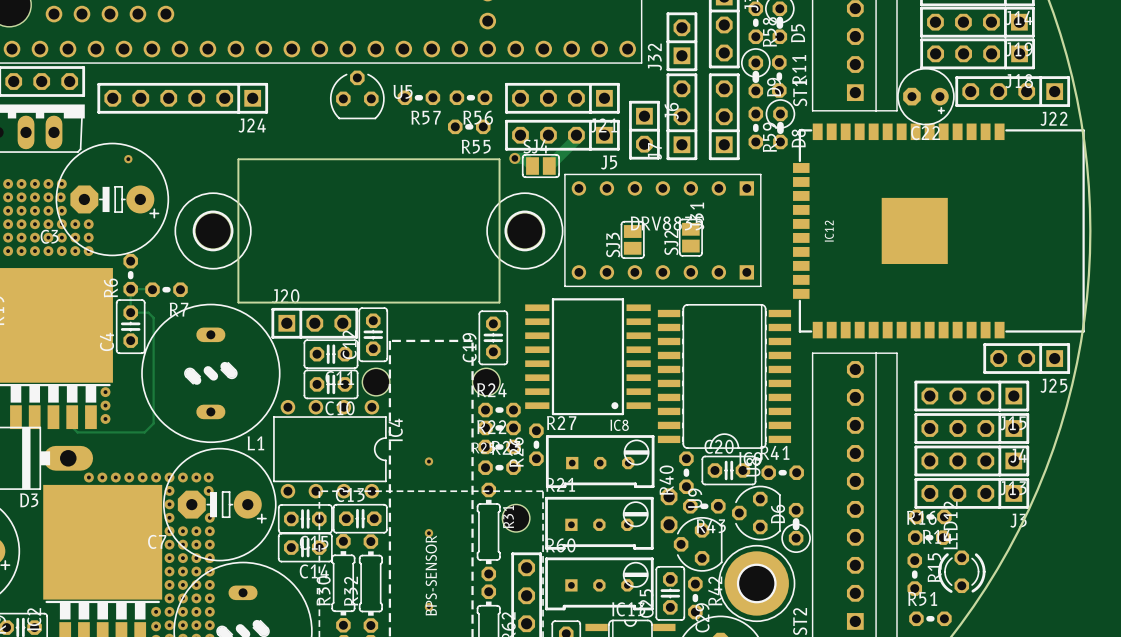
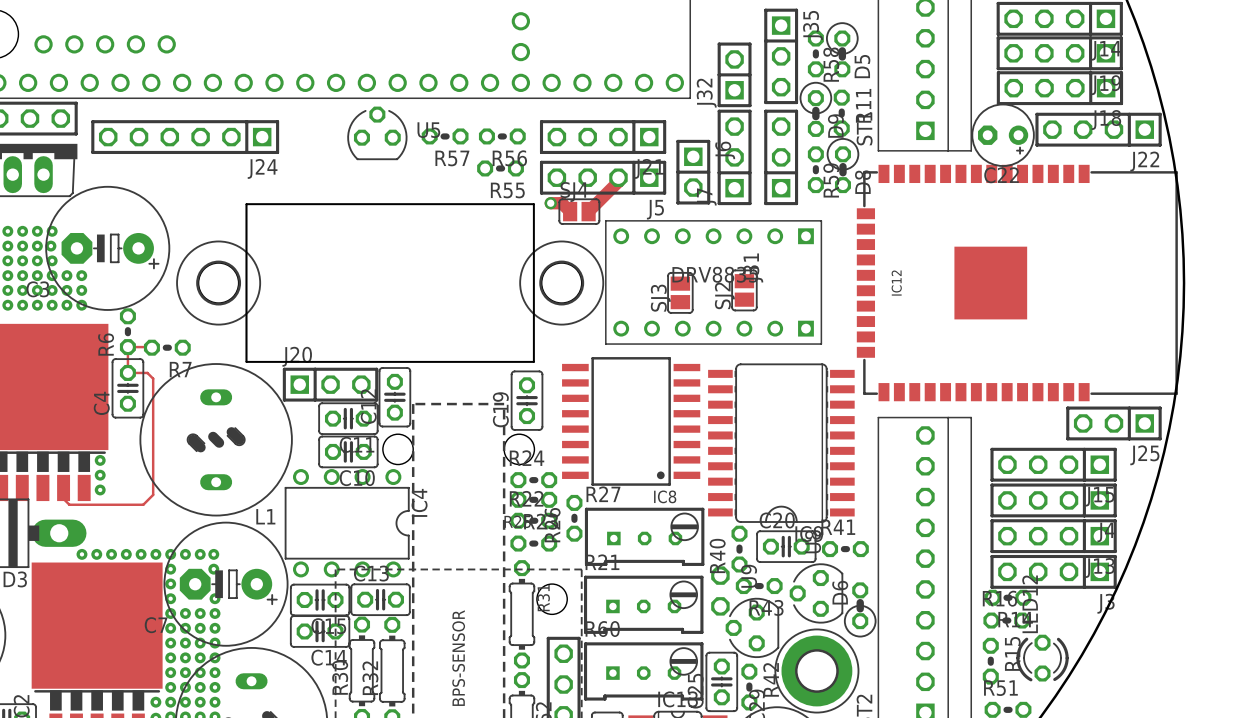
via: (128, 159) -> none
via: (428, 461) -> none
via: (428, 533) -> none
via: (428, 607) -> none

